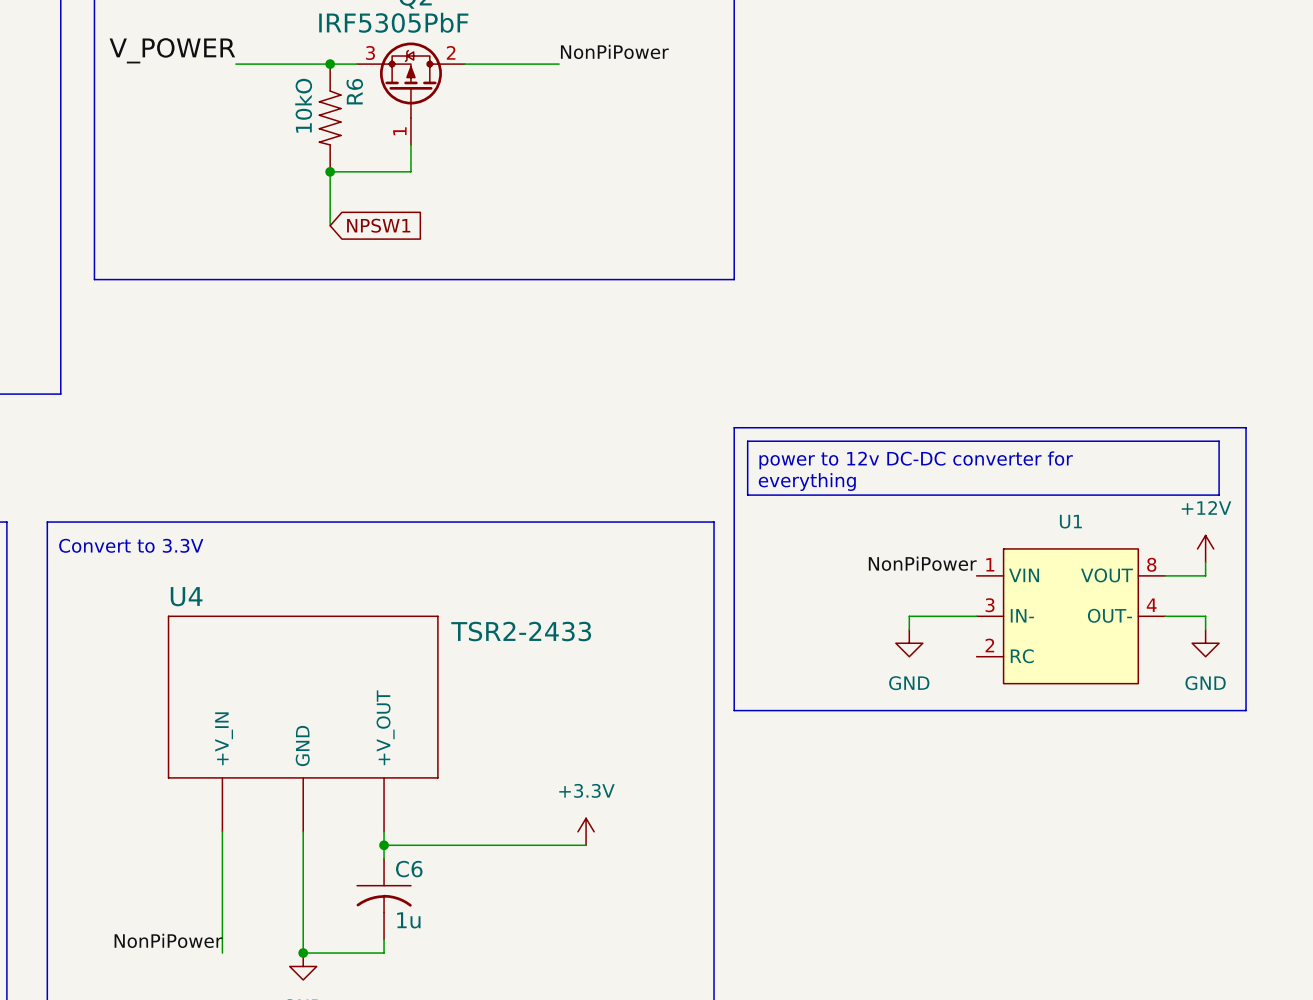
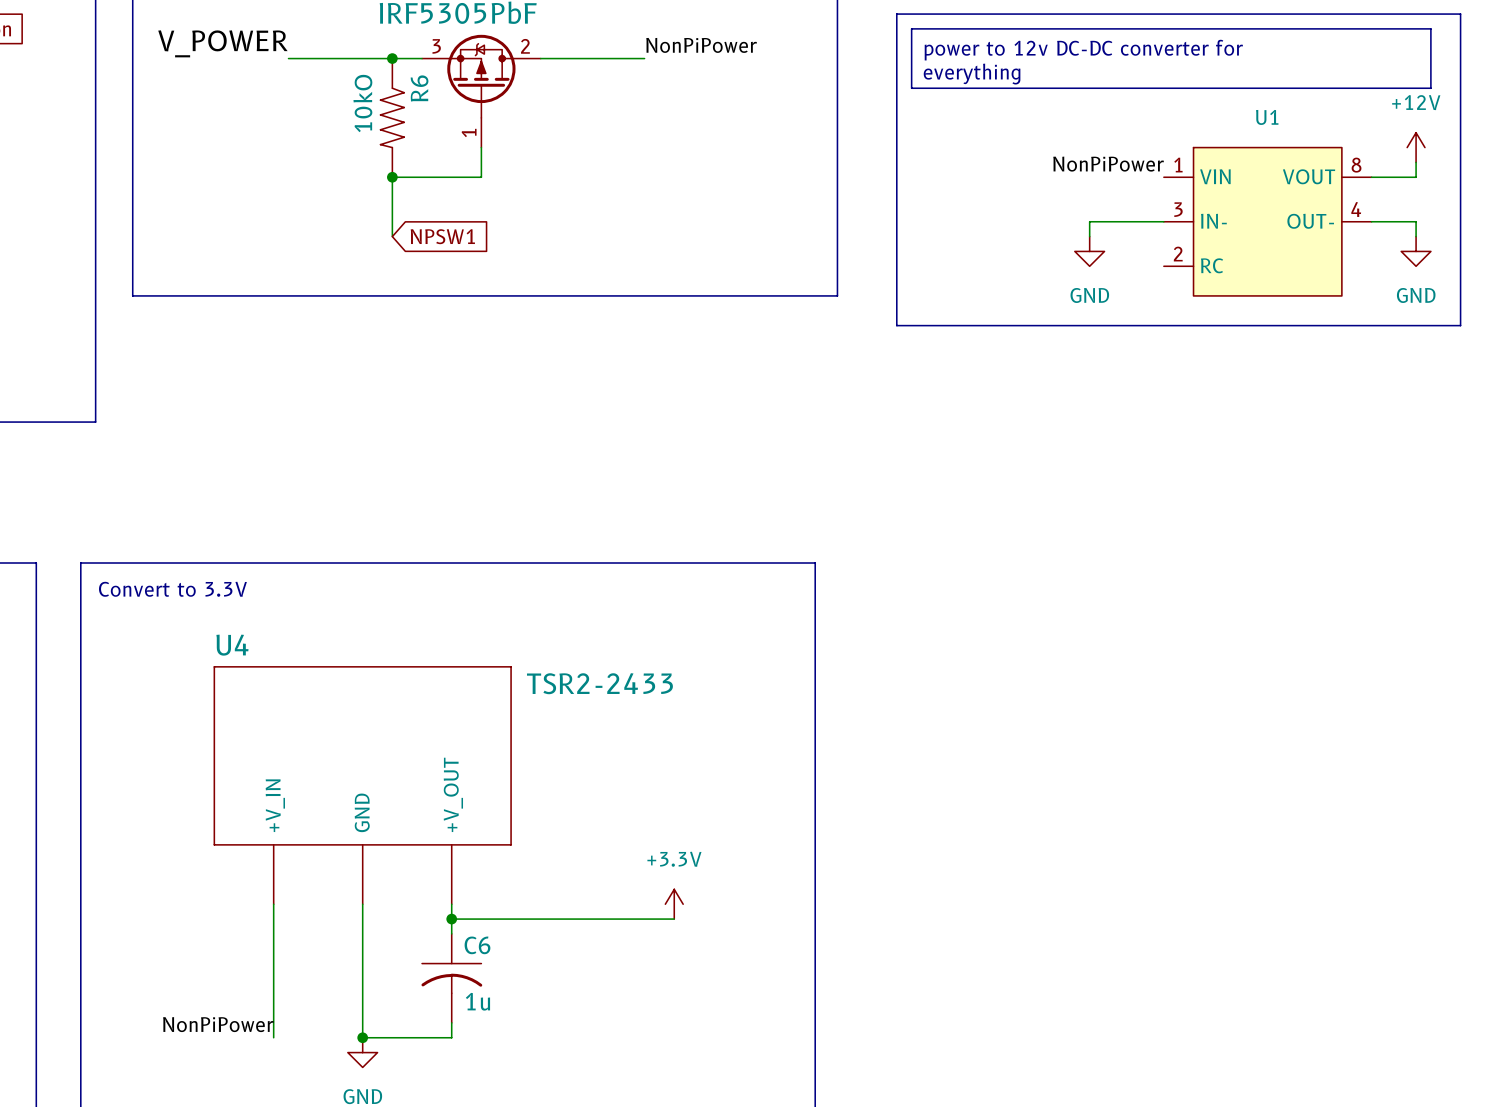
line: none -> (896, 14) (1460, 14) (1460, 325) (896, 325) (896, 14)
line: none -> (911, 28) (1430, 28) (1430, 88) (911, 88) (911, 28)
text: none -> power to 12v DC-DC converter for (1083, 50)
text: none -> everything (972, 74)
power symbol: none -> +12V (1416, 147)
wire: none -> (1416, 162) (1416, 177) (1371, 177)
label: none -> NonPiPower (1108, 164)
wire: none -> (1163, 221) (1089, 221) (1089, 236)
wire: none -> (1371, 221) (1416, 221) (1416, 236)
power symbol: none -> GND (1089, 251)
power symbol: none -> GND (1416, 251)
line: (734, 427) (734, 710) (1246, 710) (1246, 427) (734, 427) -> none
line: (747, 441) (1219, 441) (1219, 495) (747, 495) (747, 441) -> none
text: power to 12v DC-DC converter for (916, 460) -> none
text: everything (807, 482) -> none
power symbol: +12V (1205, 548) -> none
wire: (1205, 562) (1205, 575) (1165, 575) -> none
label: NonPiPower (922, 563) -> none
wire: (976, 616) (909, 616) (909, 629) -> none
U1 position: (1070, 616) -> (1267, 221)
wire: (1165, 616) (1205, 616) (1205, 629) -> none
power symbol: GND (909, 643) -> none
power symbol: GND (1205, 643) -> none

